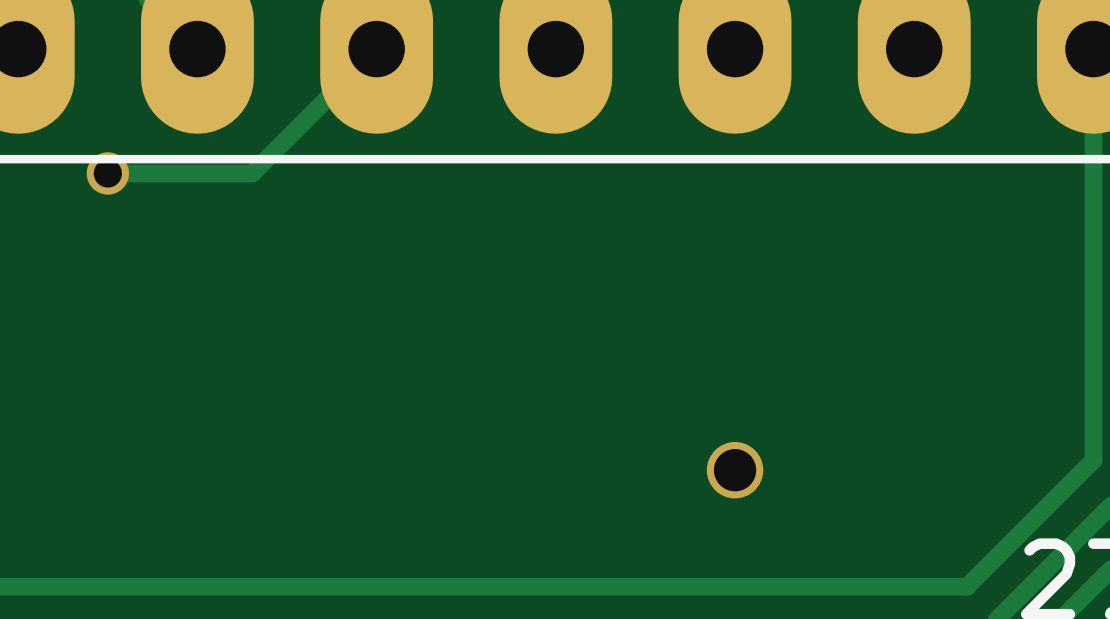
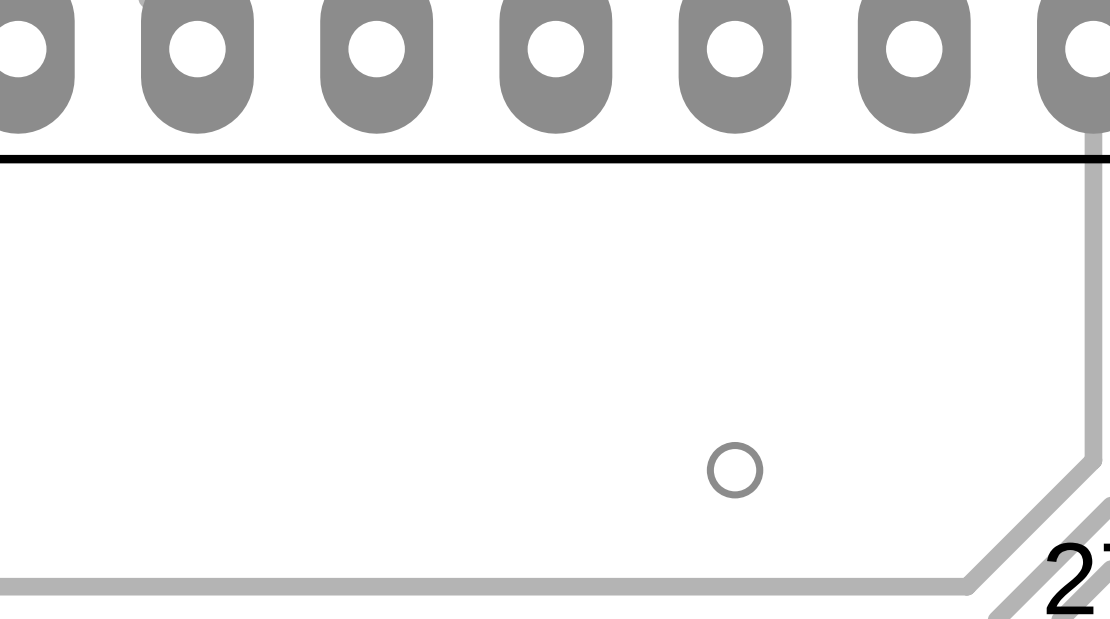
track: (376, 49) (252, 173) (107, 173) -> none
via: (107, 173) -> none

